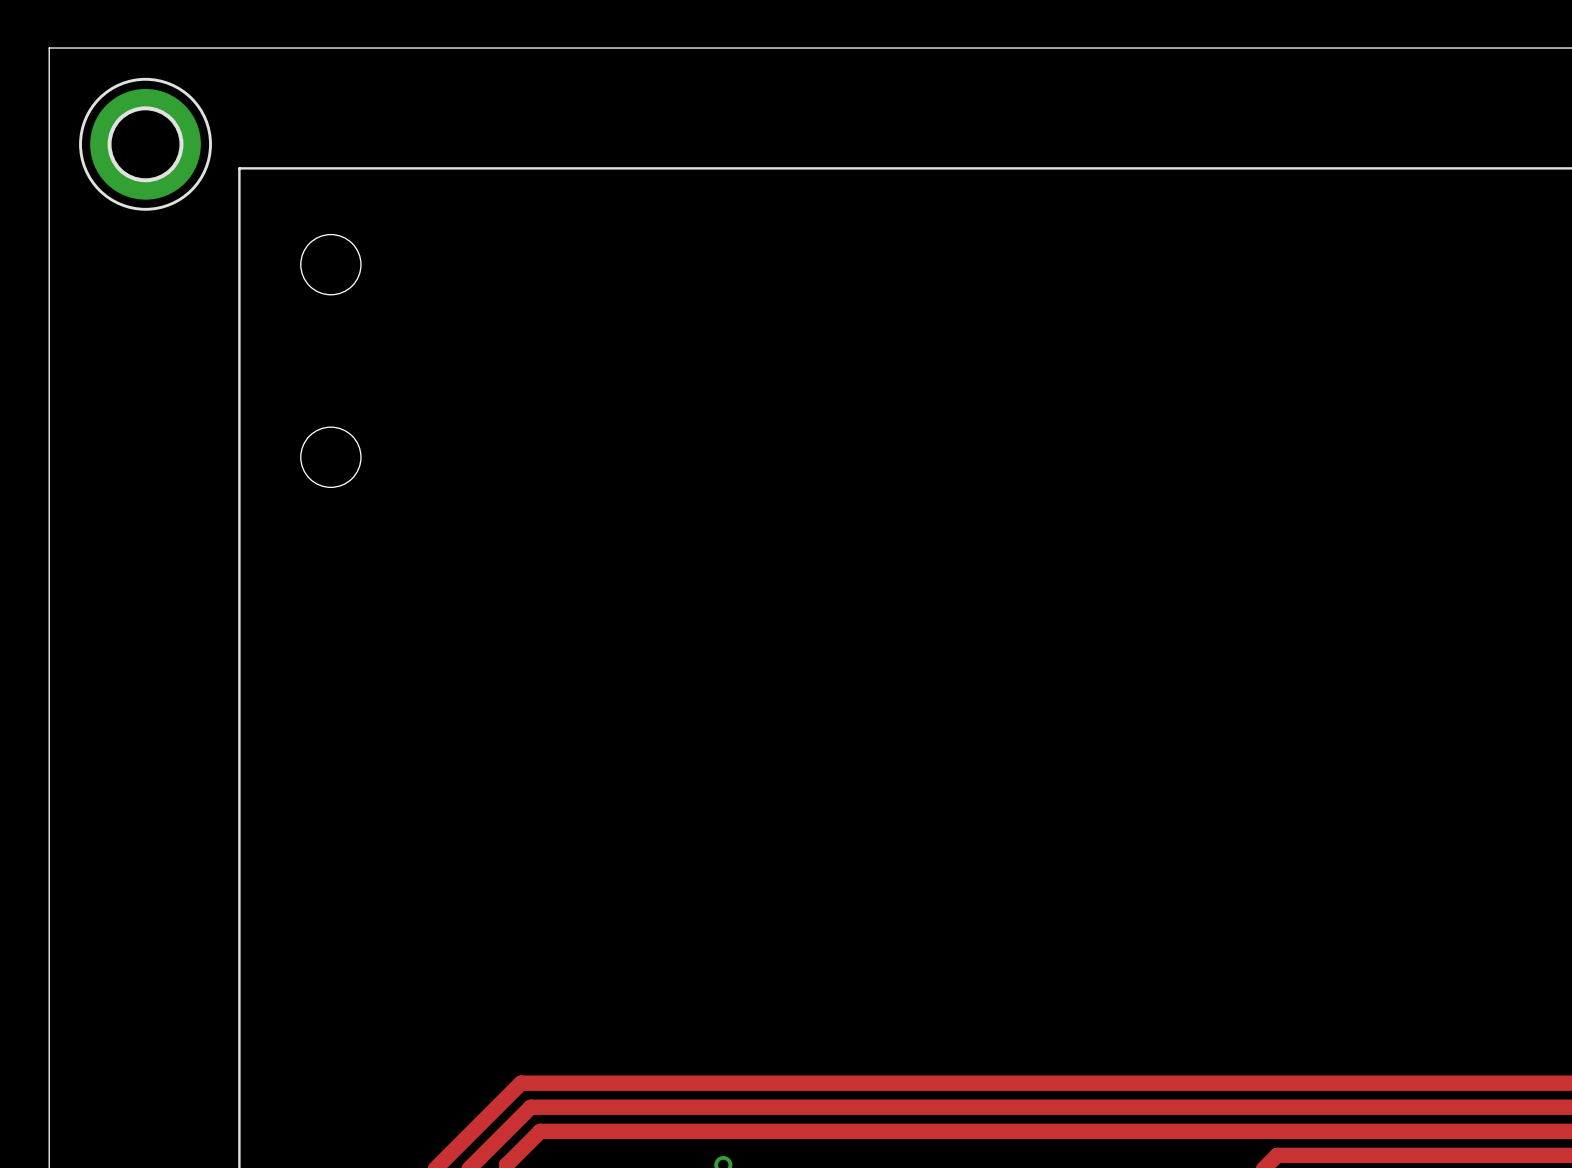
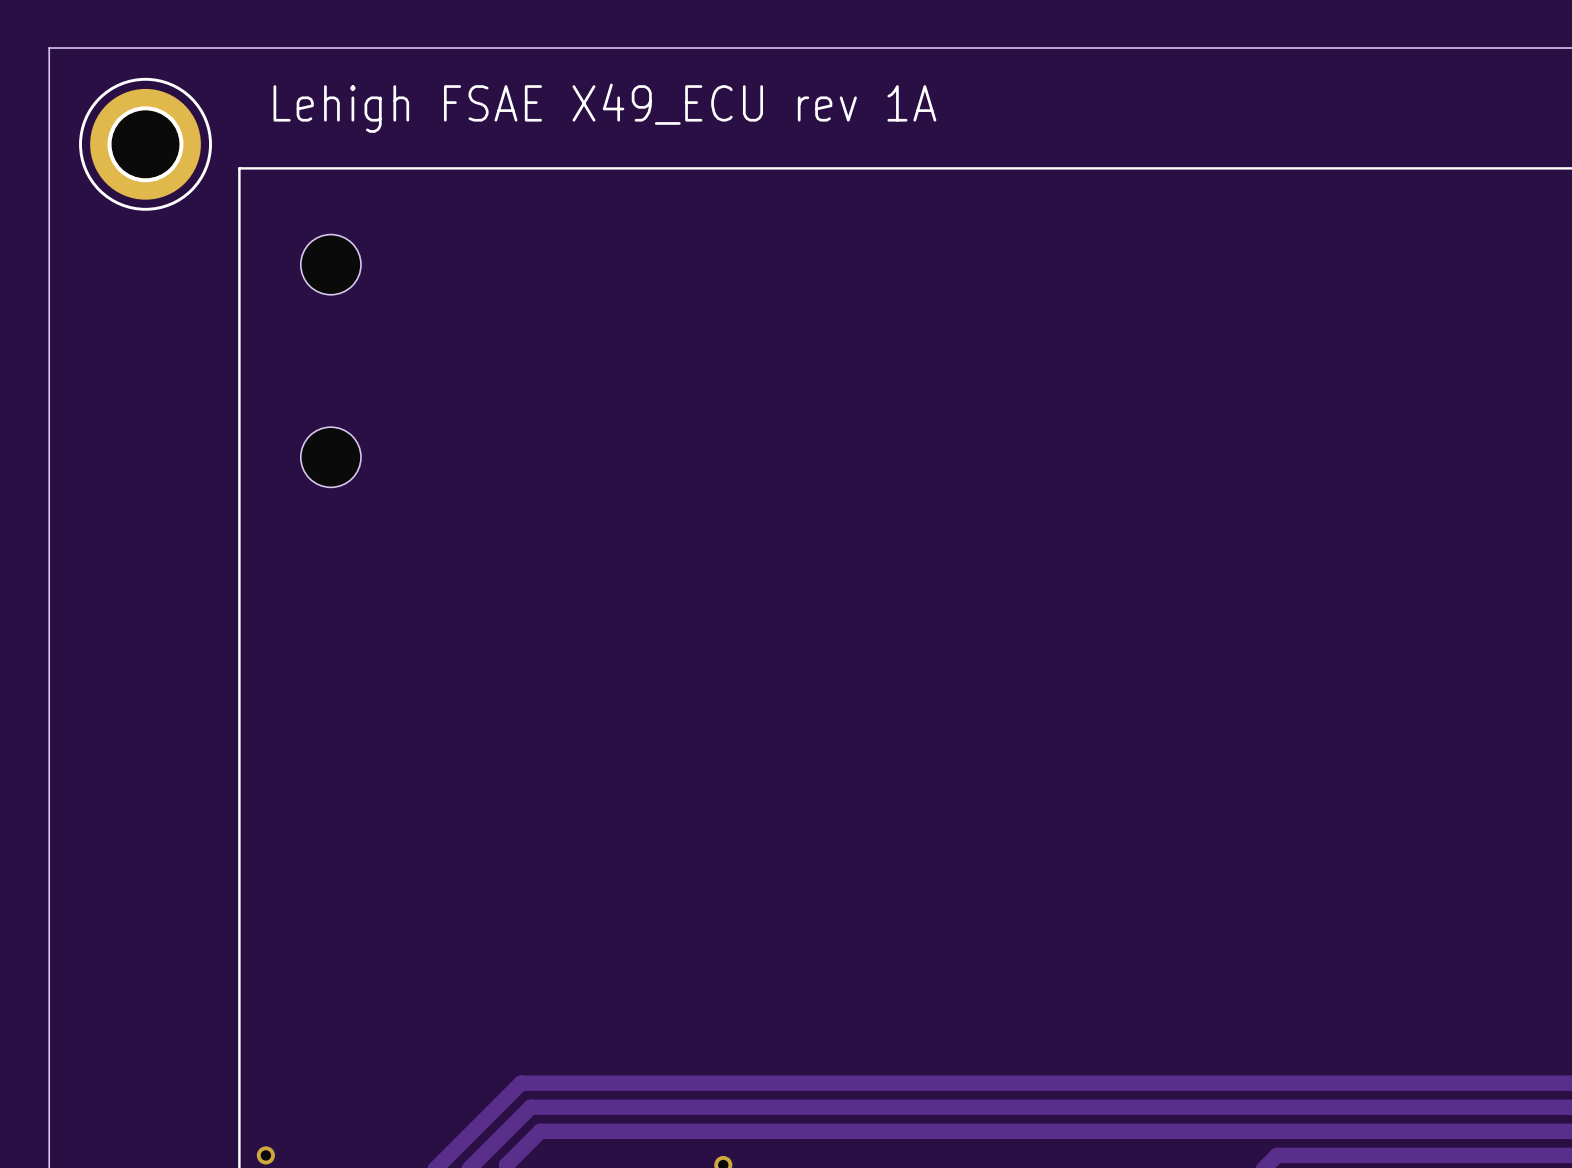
text: none -> Lehigh FSAE X49_ECU rev 1A (604, 108)
via: none -> (265, 1155)

